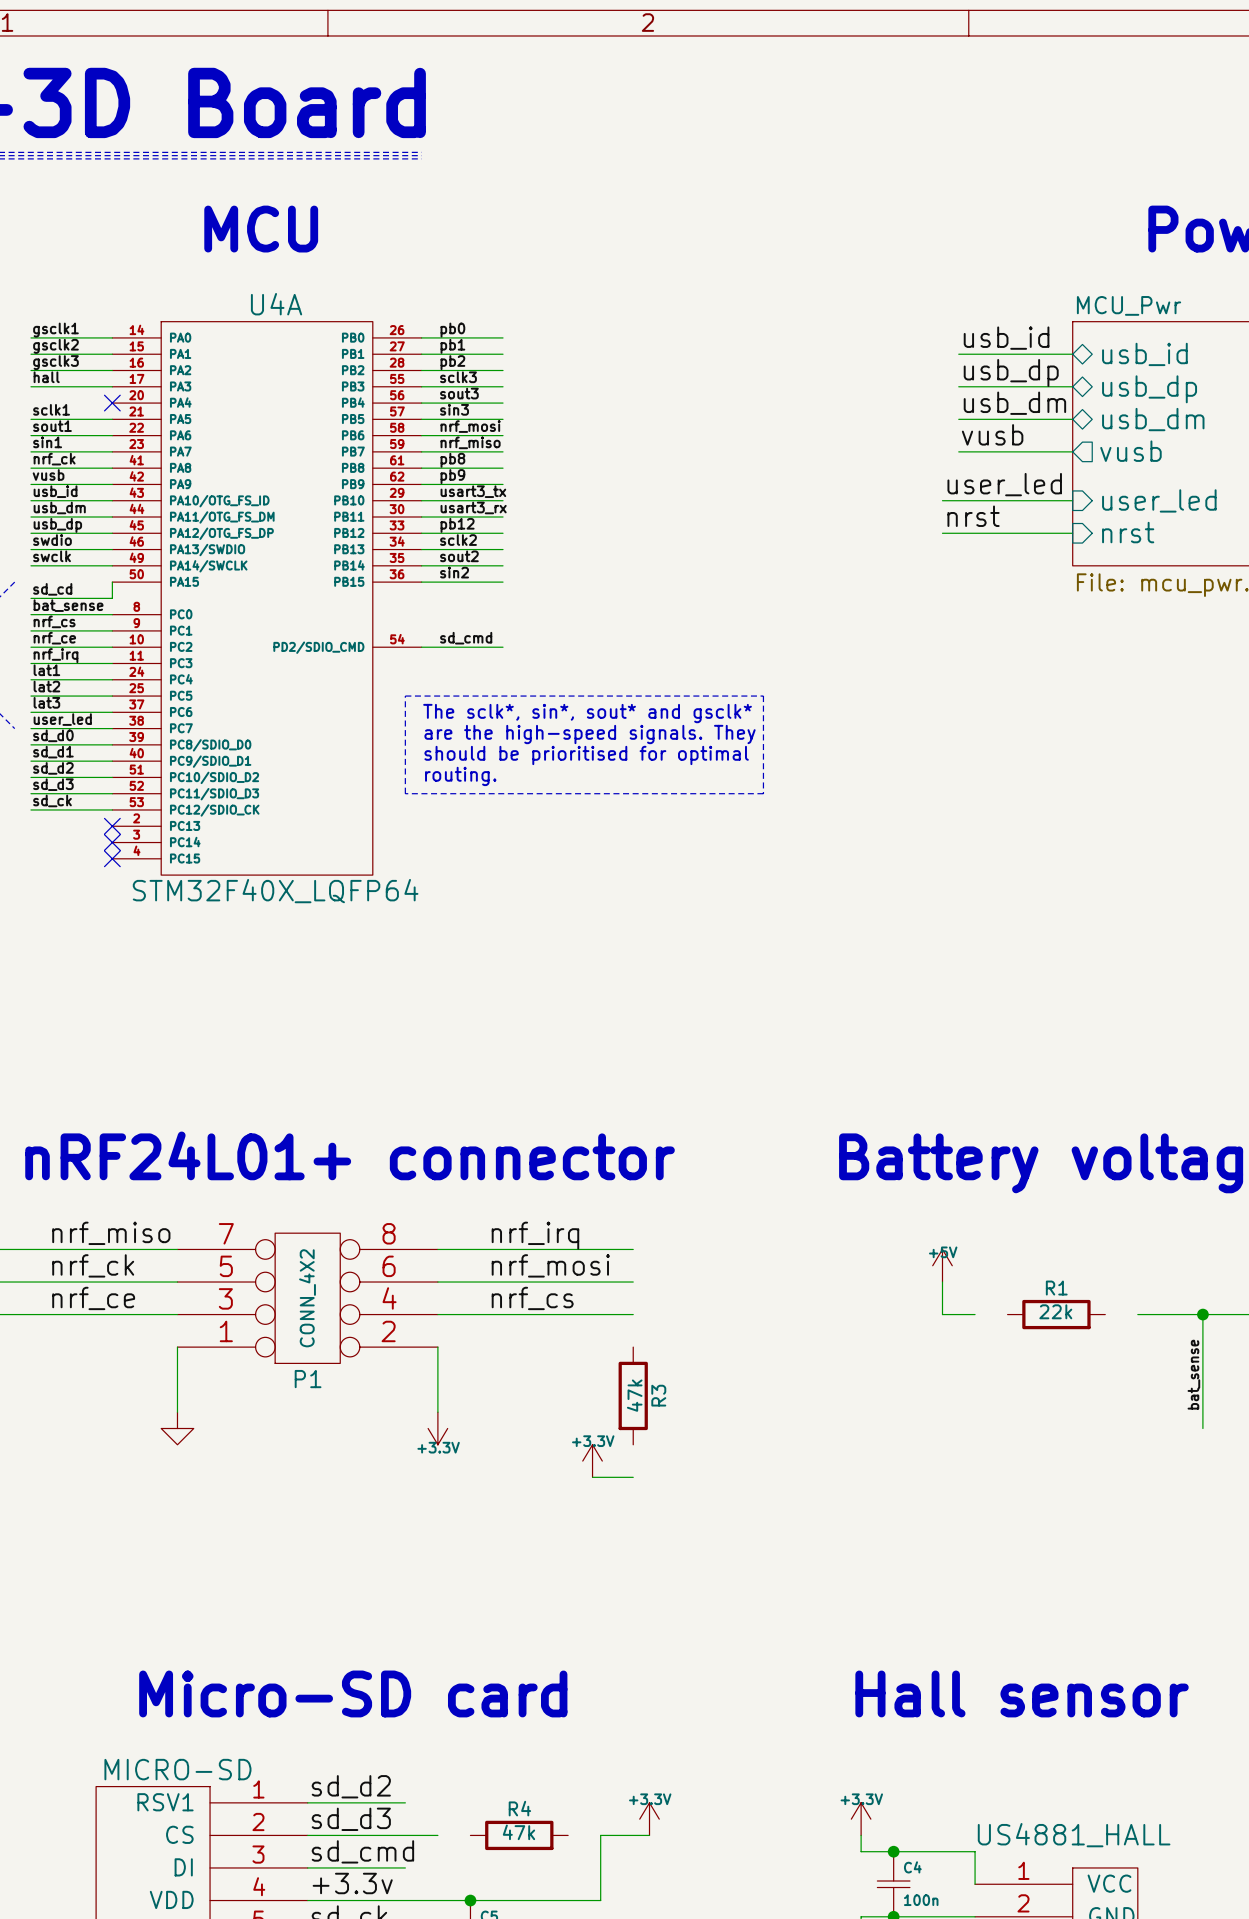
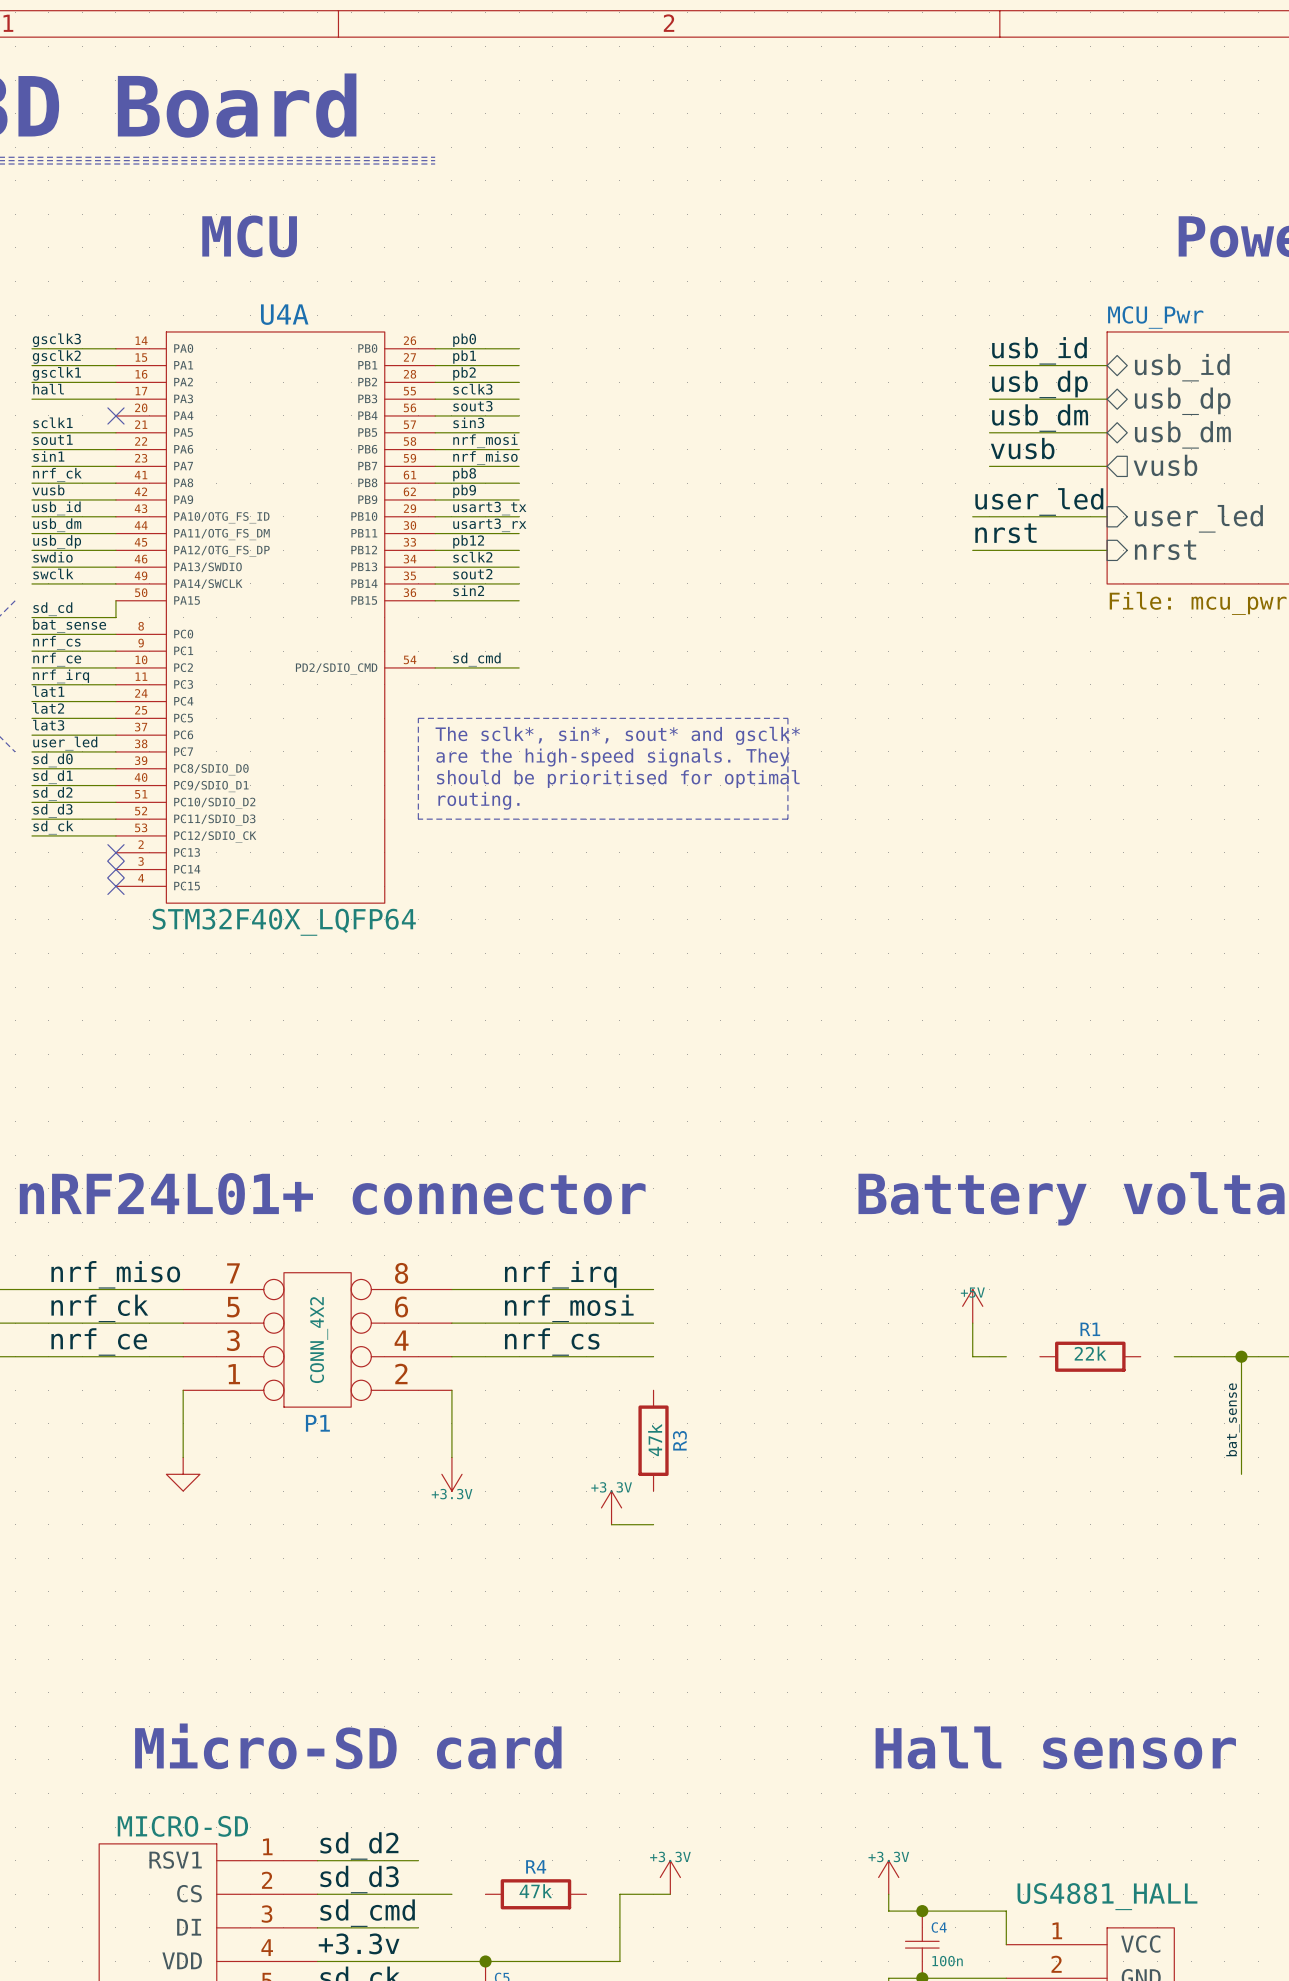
label: gsclk1 (55, 330) -> gsclk3 (56, 340)
label: gsclk3 (55, 362) -> gsclk1 (56, 373)

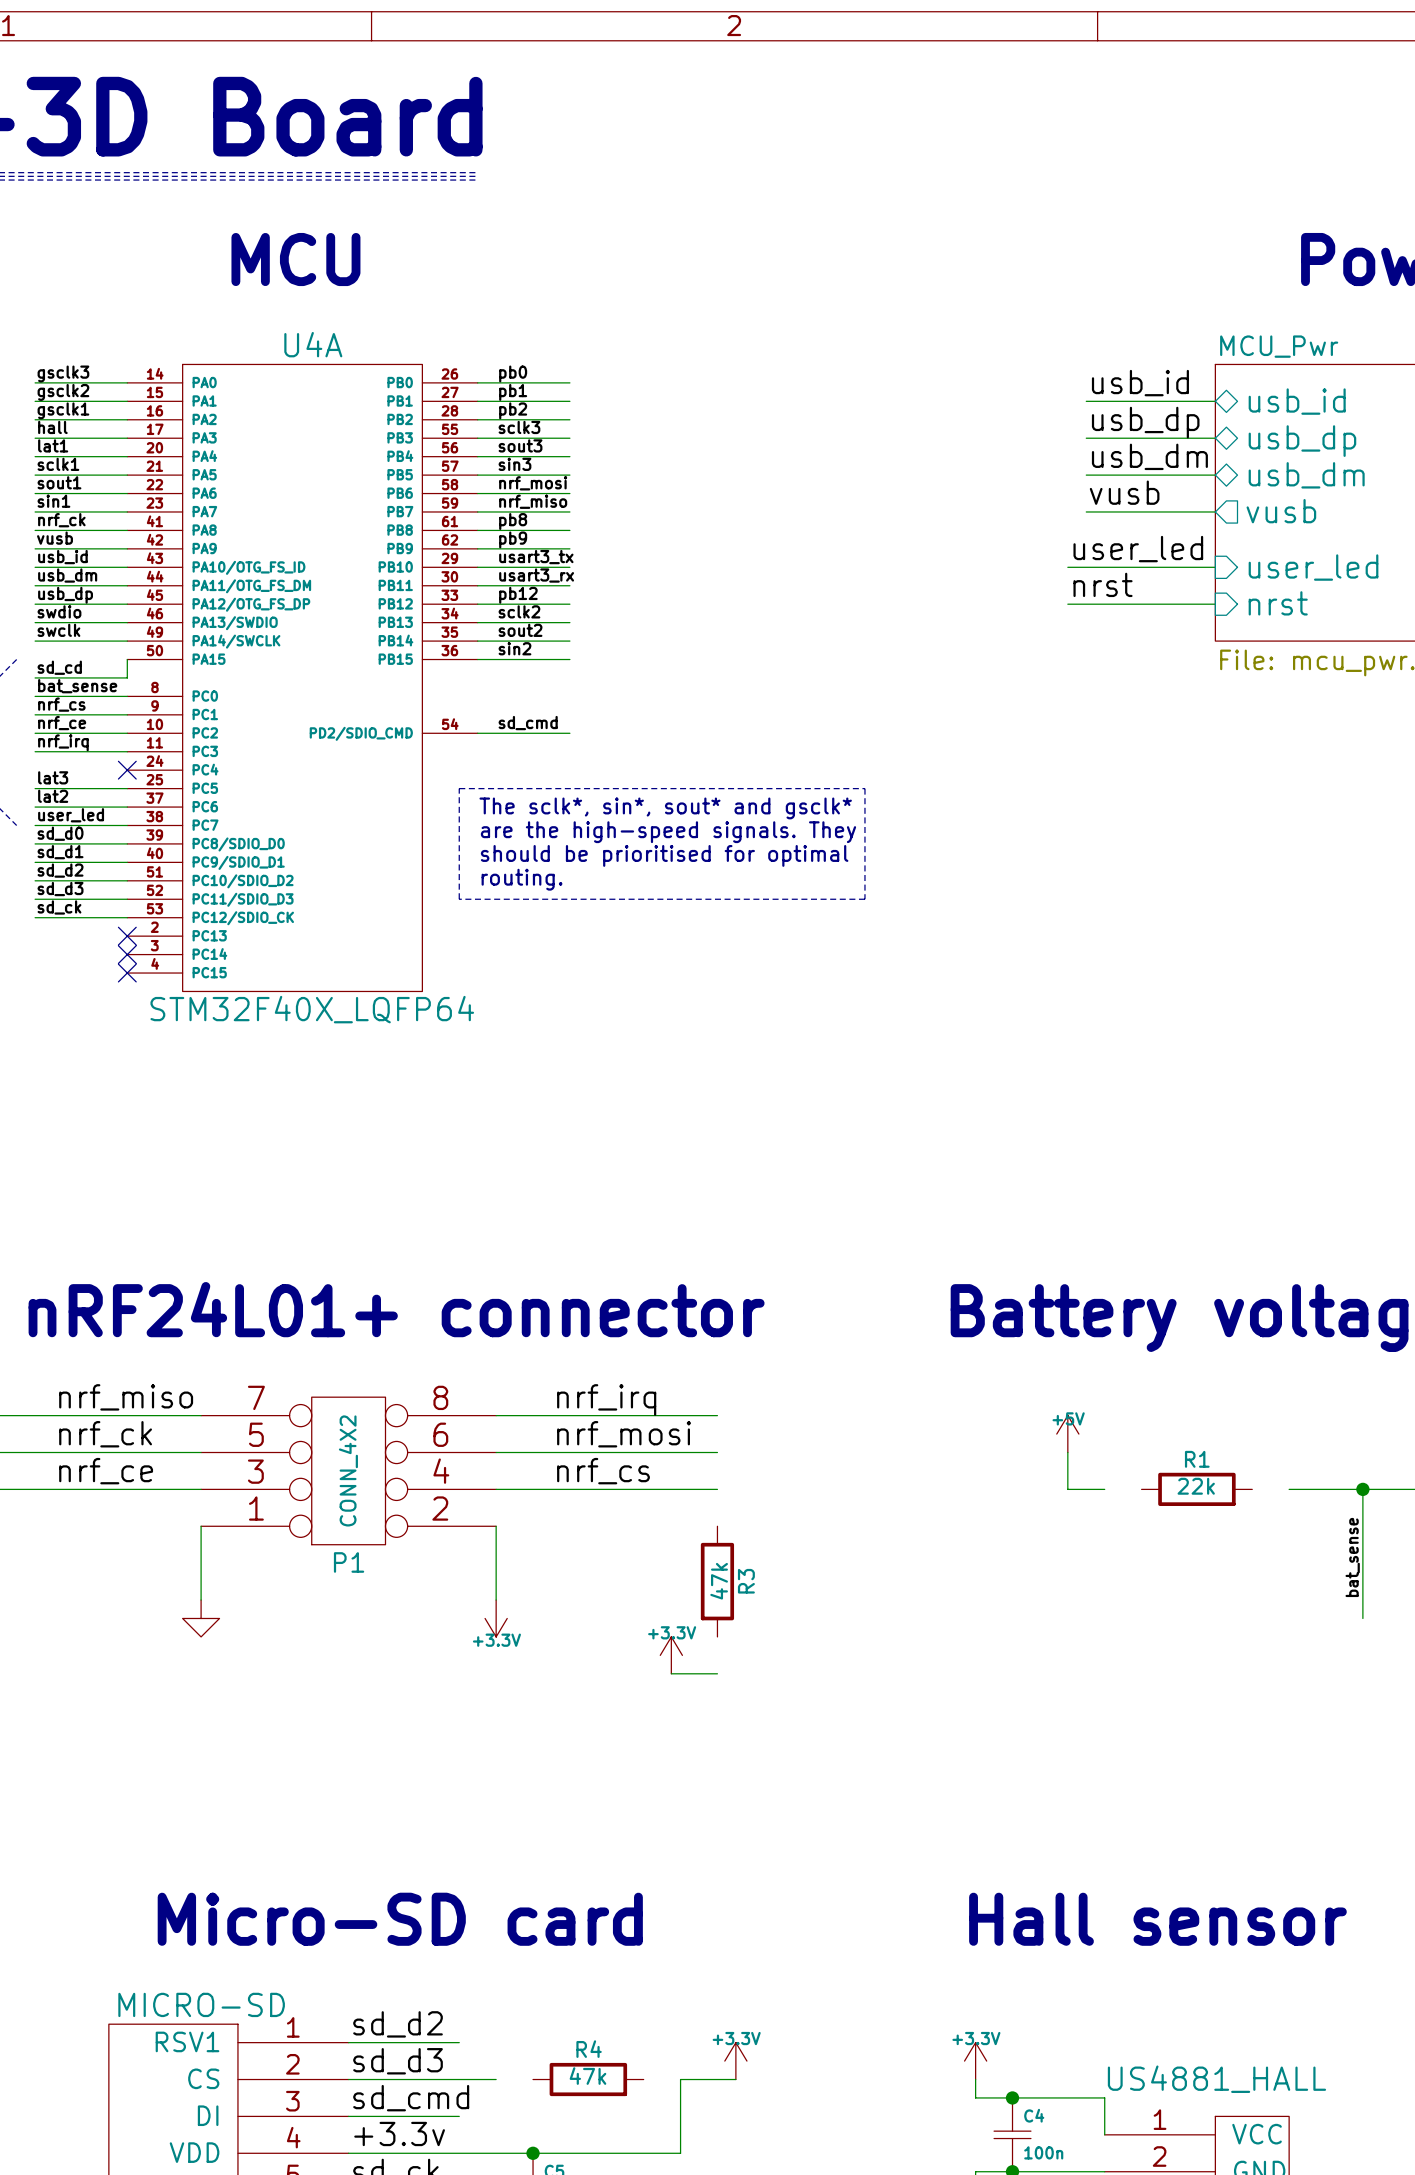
no-connect mark: (115, 415) -> none
label position: lat1 (48, 691) -> lat1 (53, 445)
wire: (31, 701) (115, 701) -> (35, 456) (127, 456)
no-connect mark: none -> (127, 770)
label: lat2 (48, 708) -> lat3 (53, 777)
label: lat3 (48, 725) -> lat2 (53, 796)

